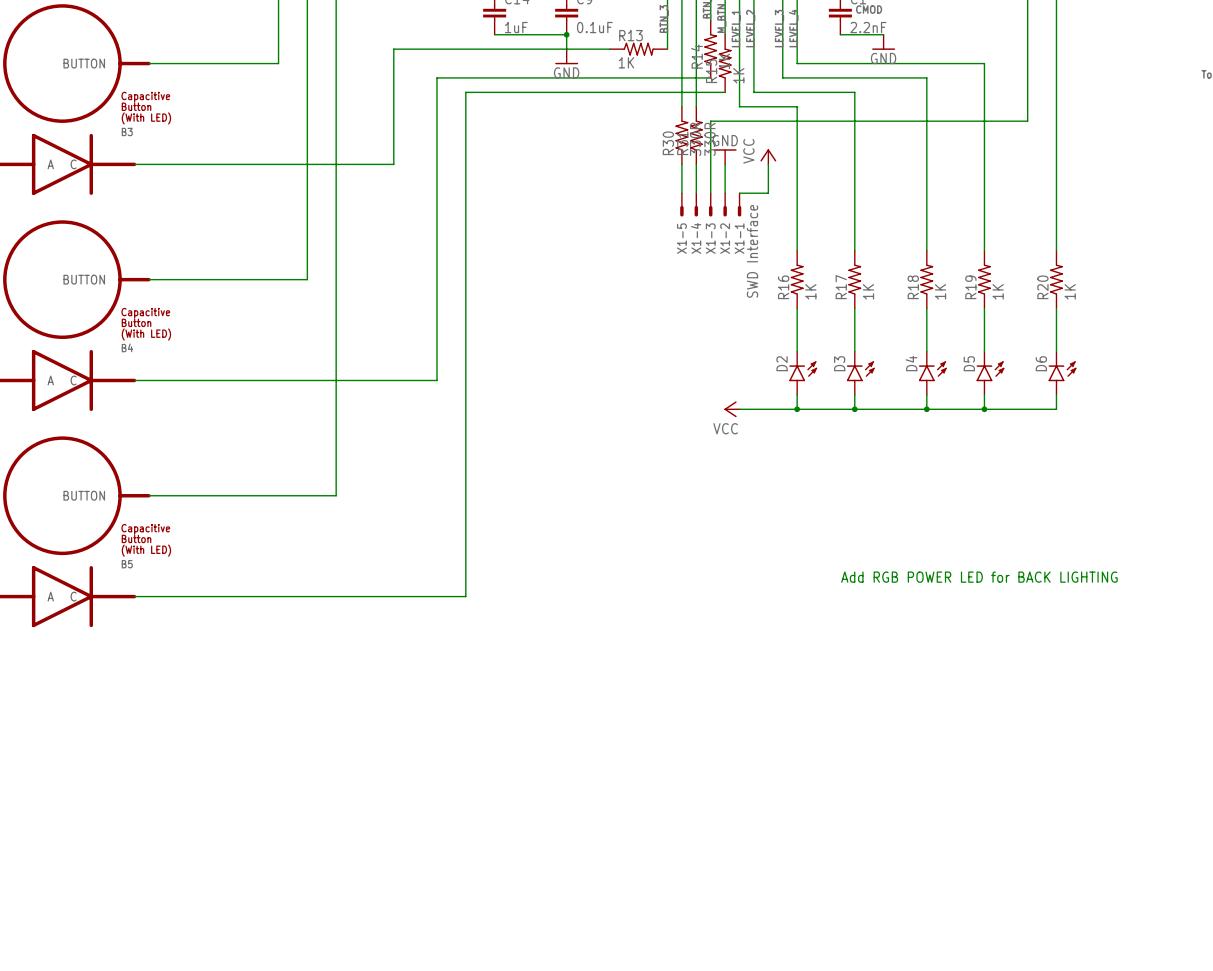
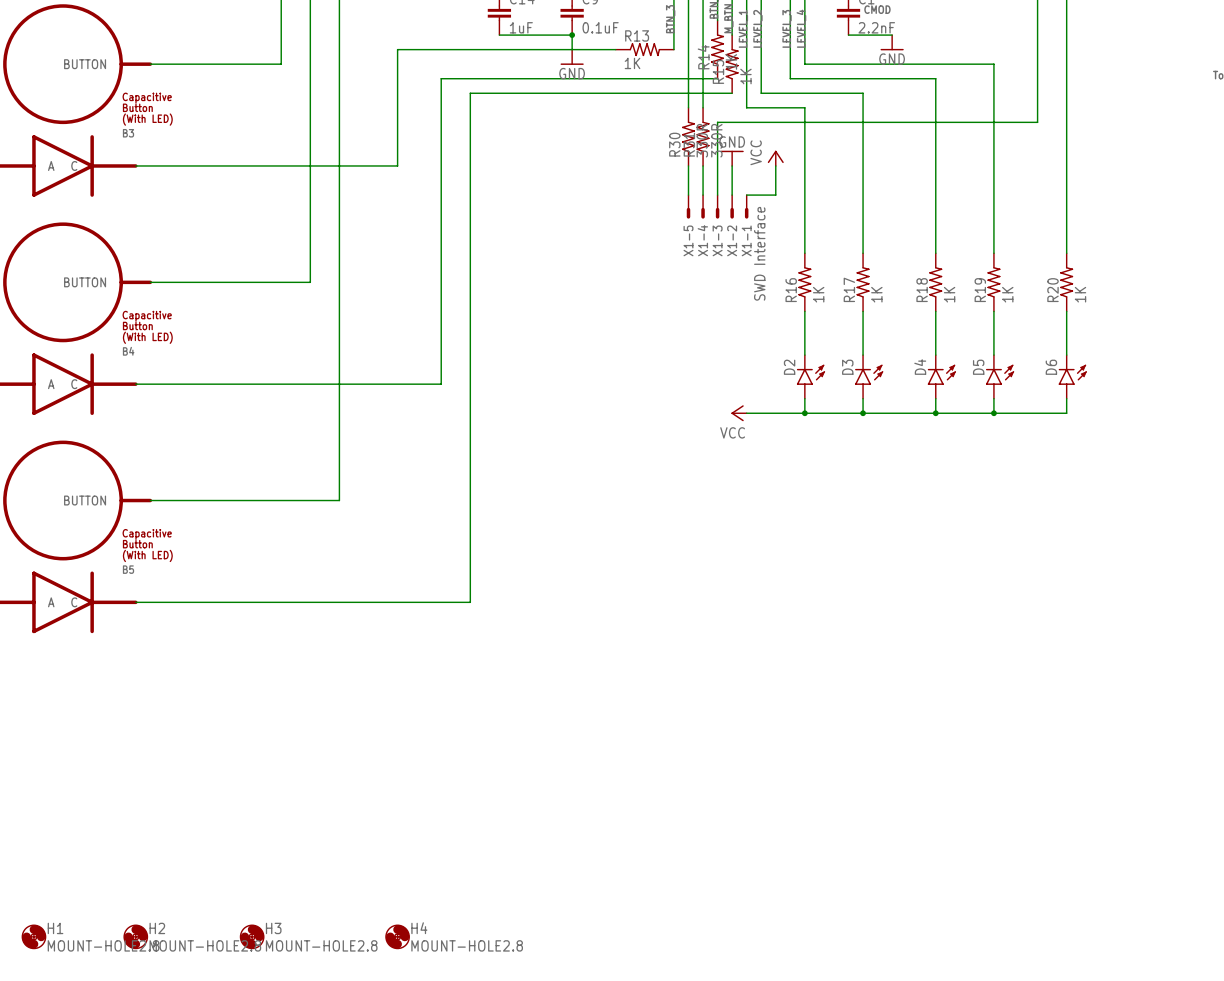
text: Add RGB POWER LED for BACK LIGHTING (979, 577) -> none
H1: none -> MOUNT-HOLE2.8 (33, 936)
H2: none -> MOUNT-HOLE2.8 (135, 936)
H3: none -> MOUNT-HOLE2.8 (252, 936)
H4: none -> MOUNT-HOLE2.8 (397, 936)

